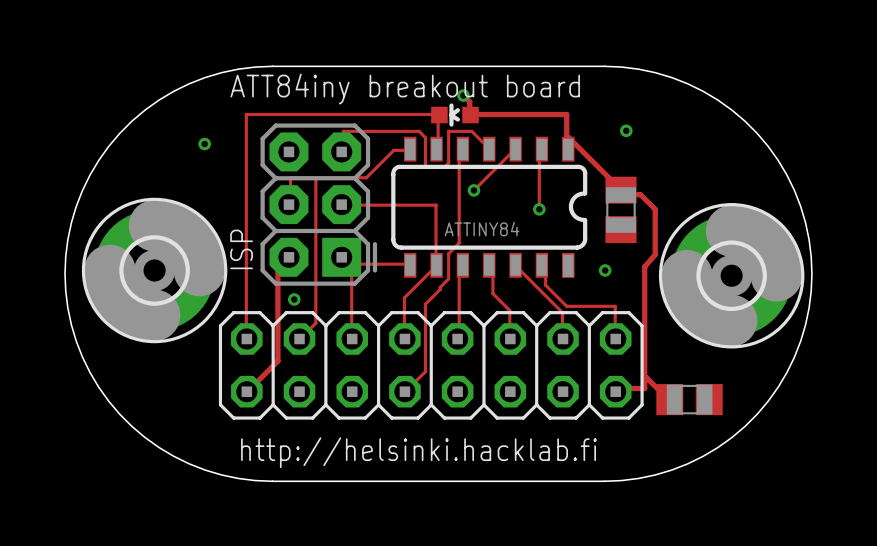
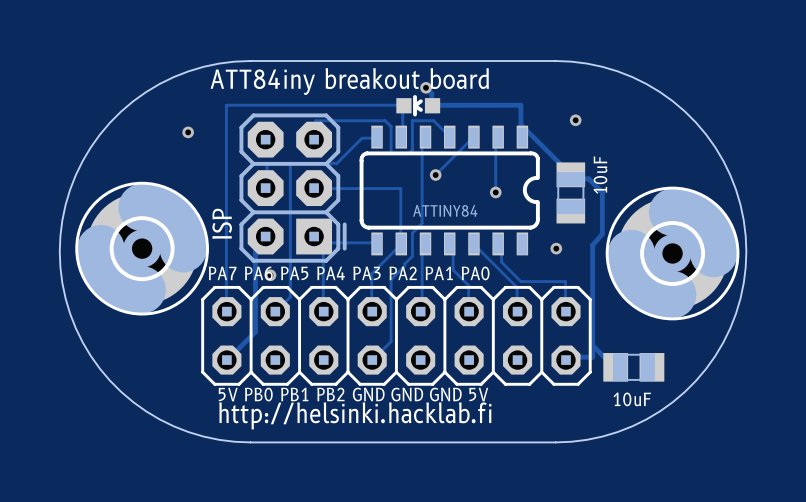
text: none -> 10uF (600, 175)
text: none -> PA7 PA6 PA5 PA4 PA3 PA2 PA1 PA0 (349, 273)
text: none -> 5V PB0 PB1 PB2 GND GND GND 5V (353, 394)
text: none -> 10uF (632, 399)

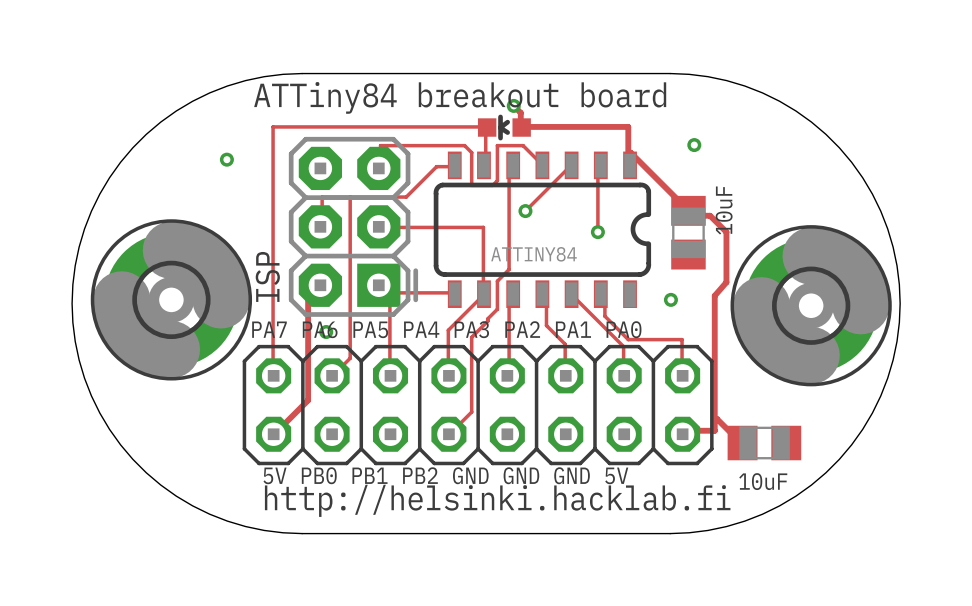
text: ATT84iny breakout board (349, 81) -> ATTiny84 breakout board (460, 97)

